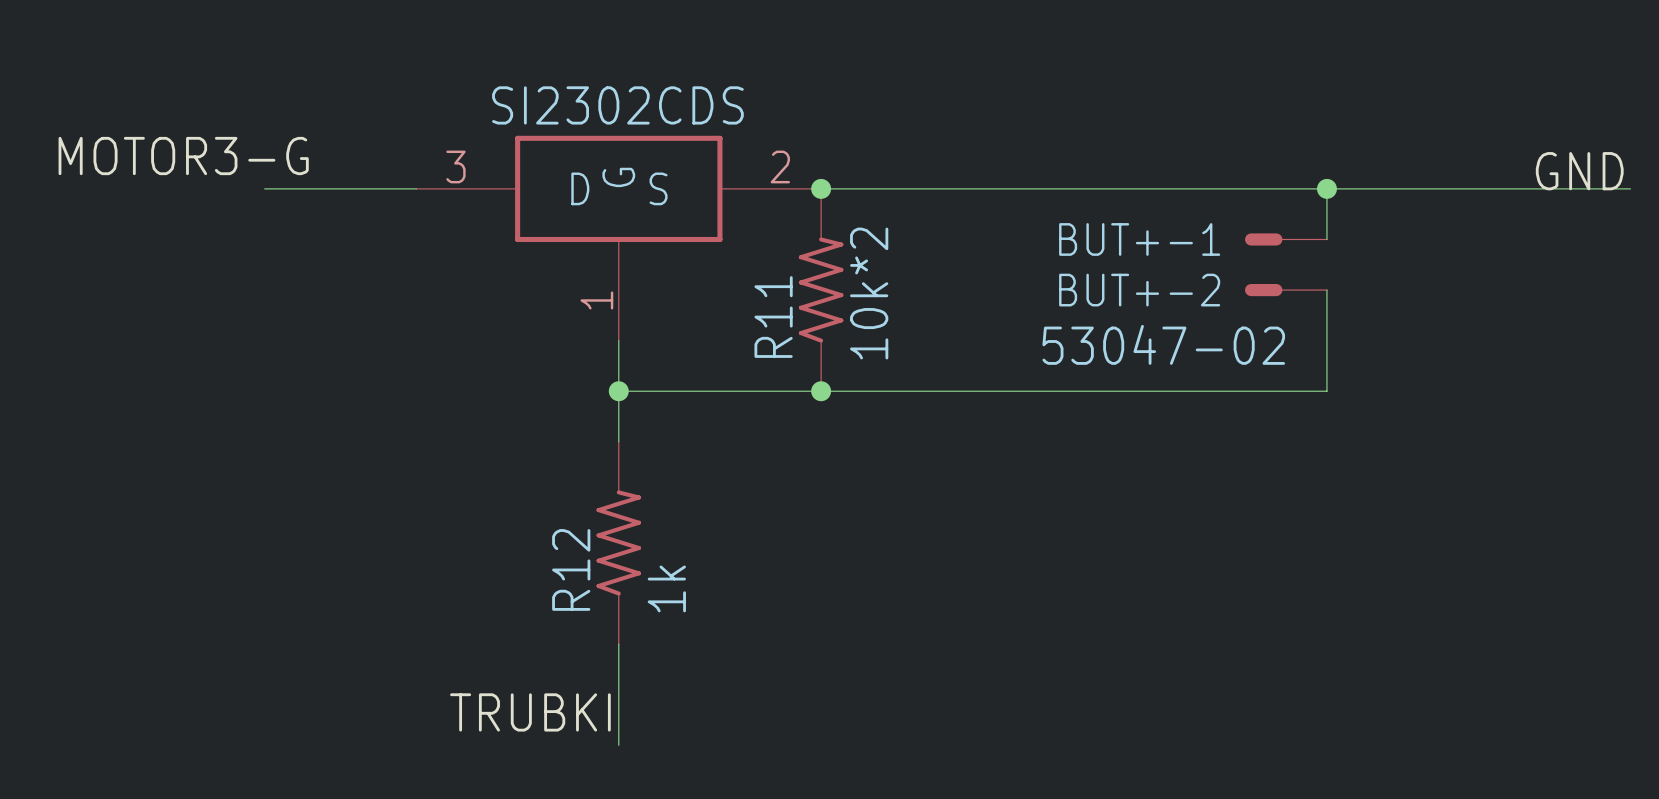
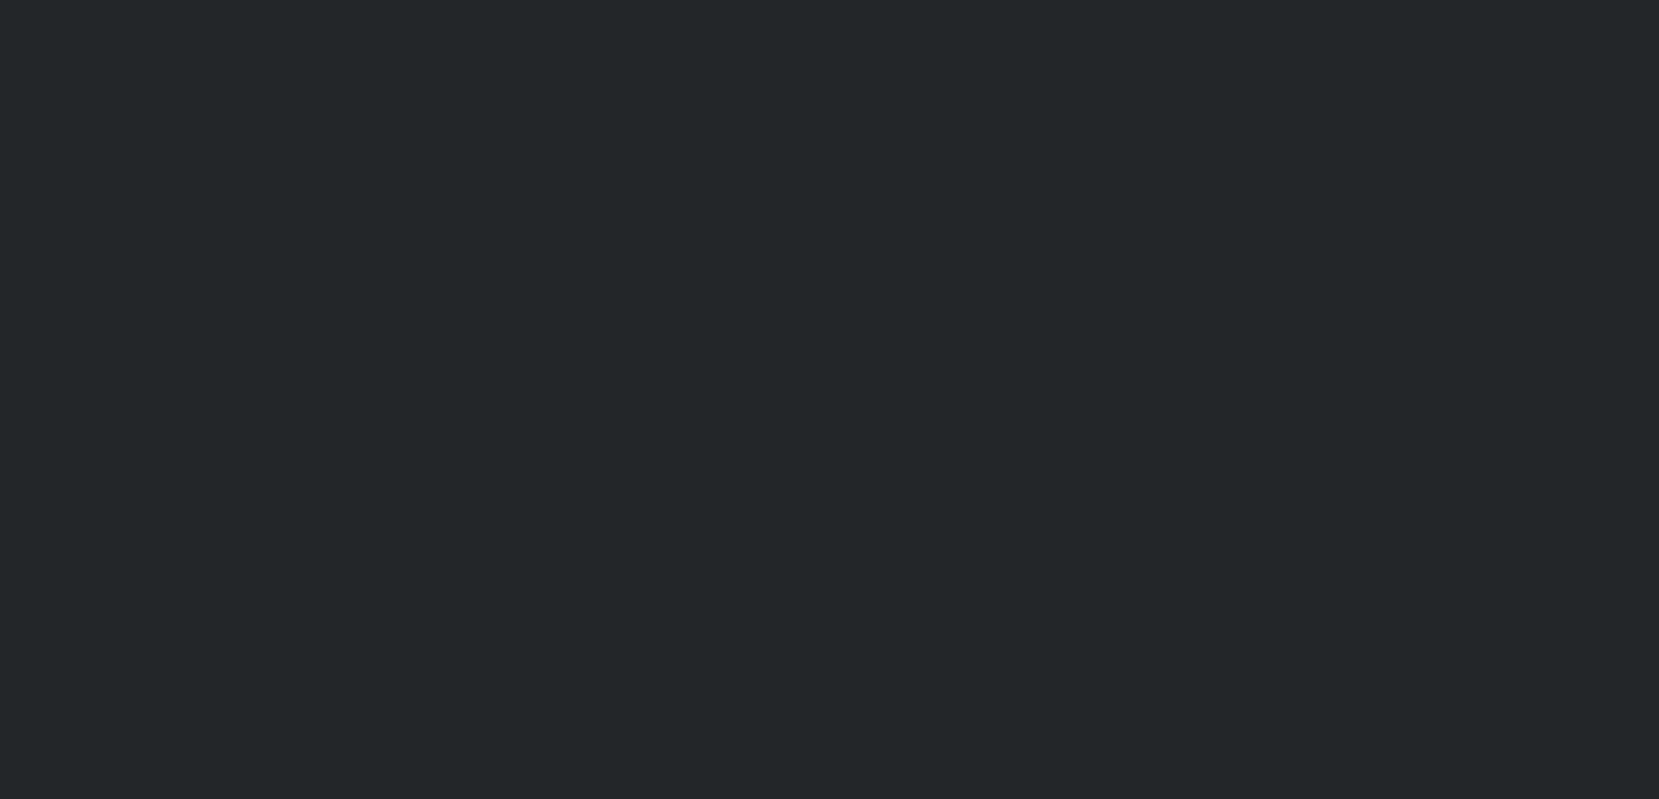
label: MOTOR3-G (183, 156) -> none
label: GND (1579, 171) -> none
wire: (264, 188) (416, 188) -> none
wire: (821, 188) (1630, 188) -> none
junction: (821, 188) -> none
wire: (1326, 188) (1326, 239) -> none
junction: (1326, 188) -> none
part: (618, 238) -> none
BUT+-1: 53047-02 (1285, 239) -> none
R11: 10k*2 (821, 290) -> none
BUT+-2: (1285, 290) -> none
wire: (1326, 290) (1326, 391) (618, 391) -> none
wire: (618, 340) (618, 441) -> none
junction: (618, 391) -> none
junction: (821, 391) -> none
R12: 1k (618, 542) -> none
wire: (618, 644) (618, 745) -> none
label: TRUBKI (530, 712) -> none

